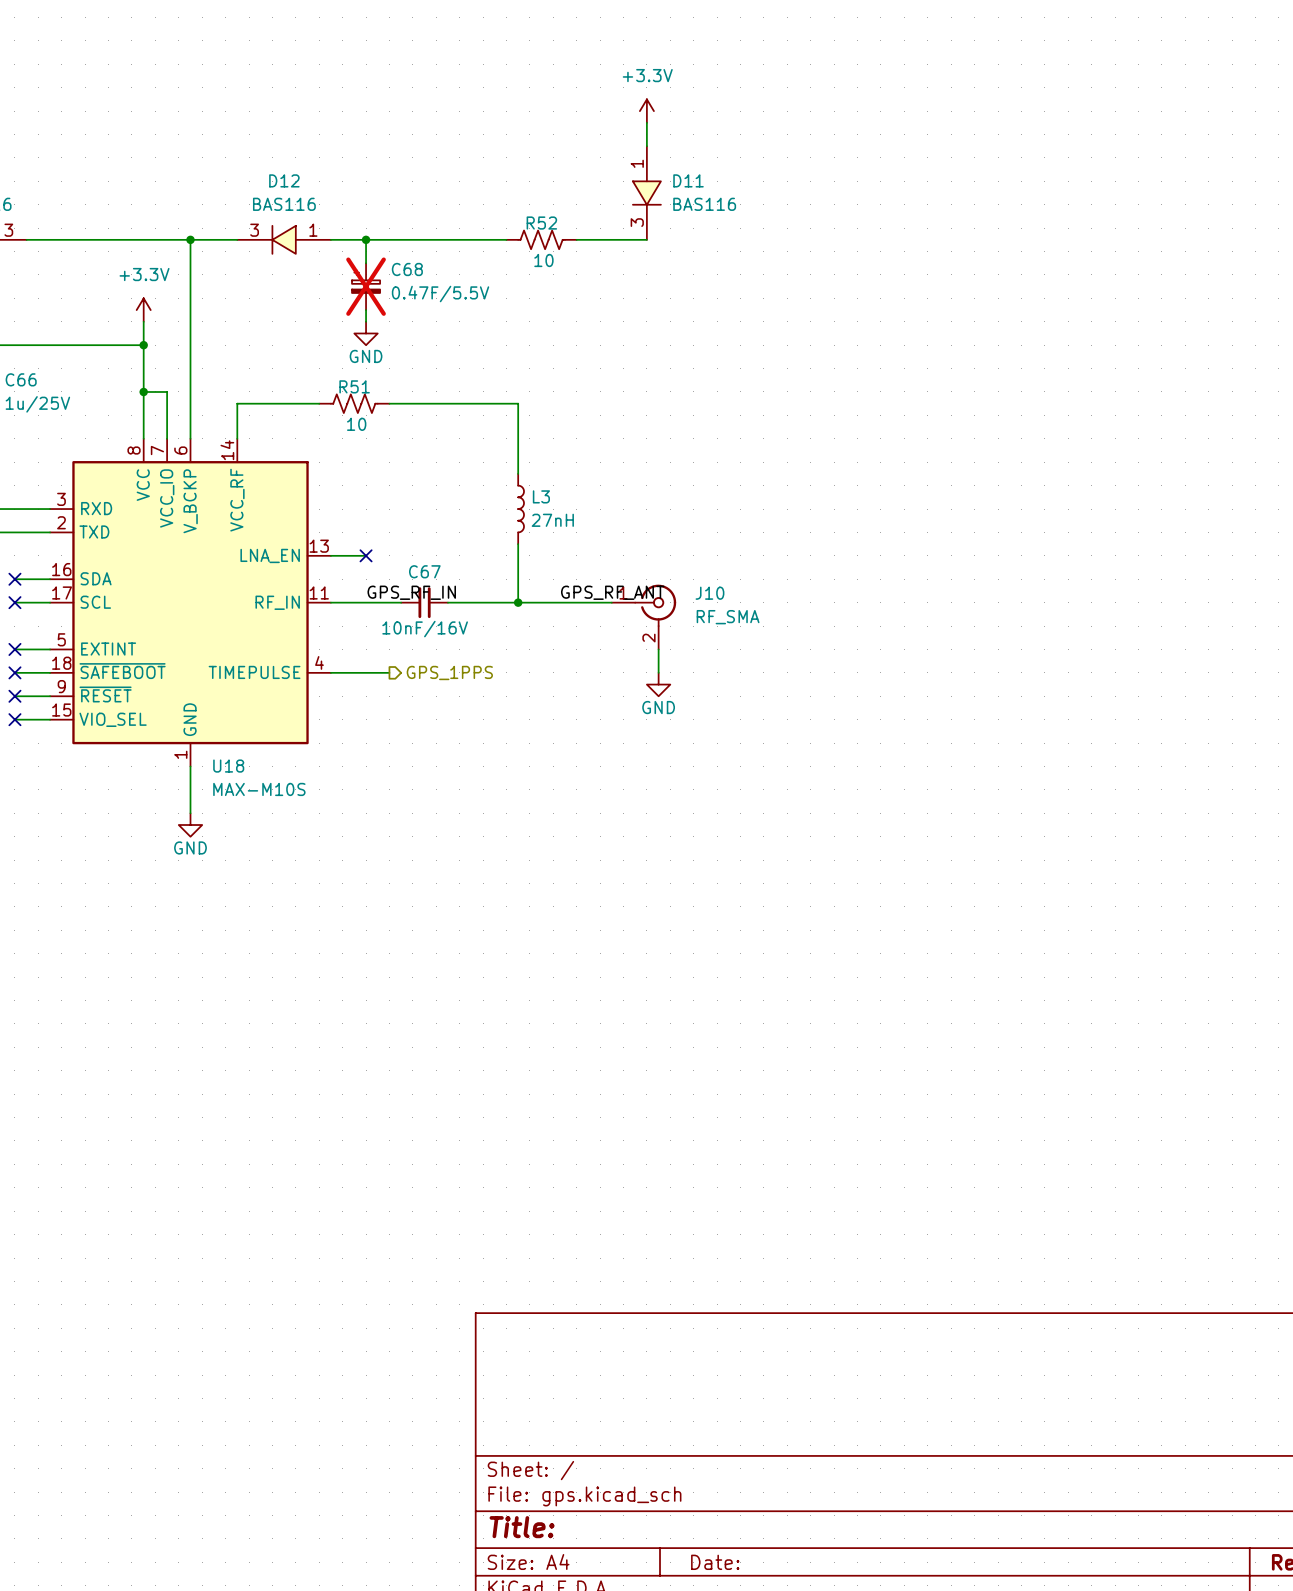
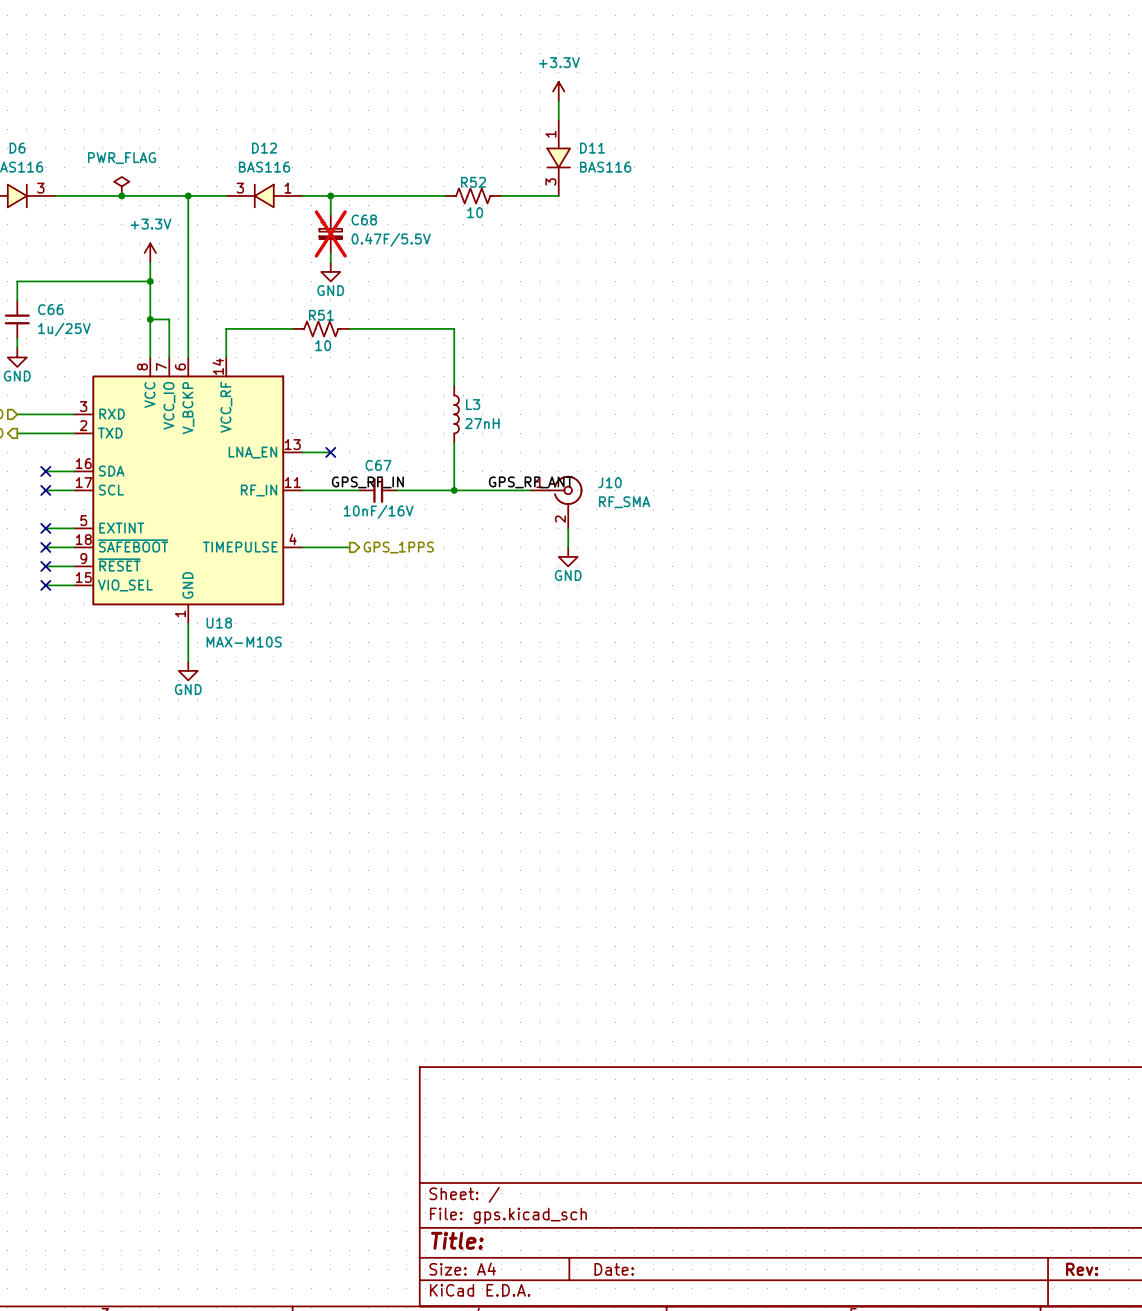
power symbol: none -> PWR_FLAG (121, 186)
junction: none -> (121, 195)

